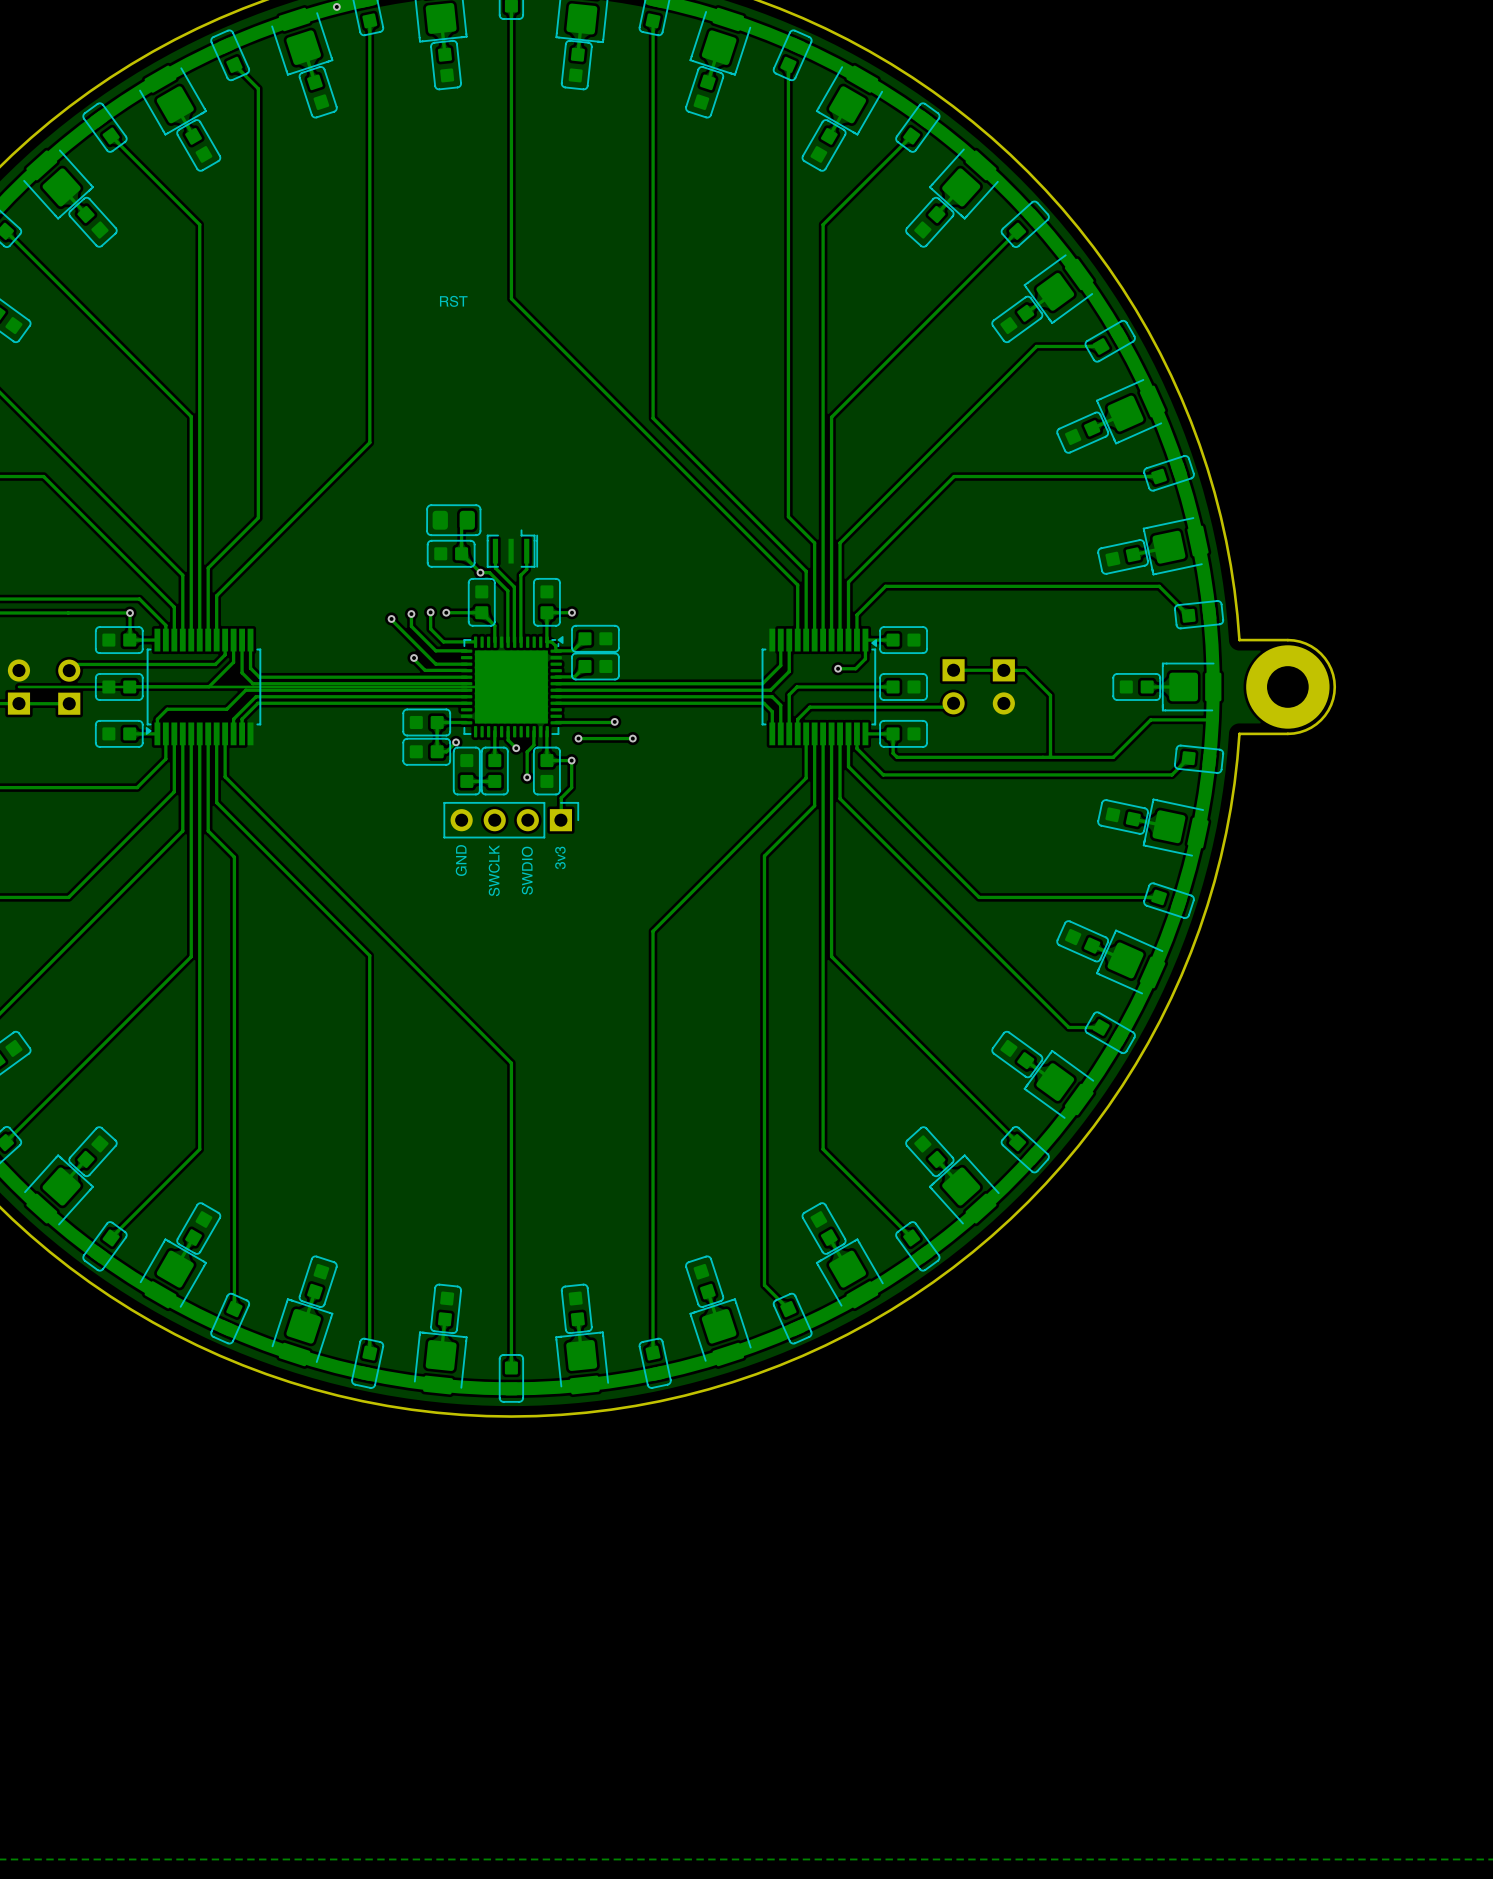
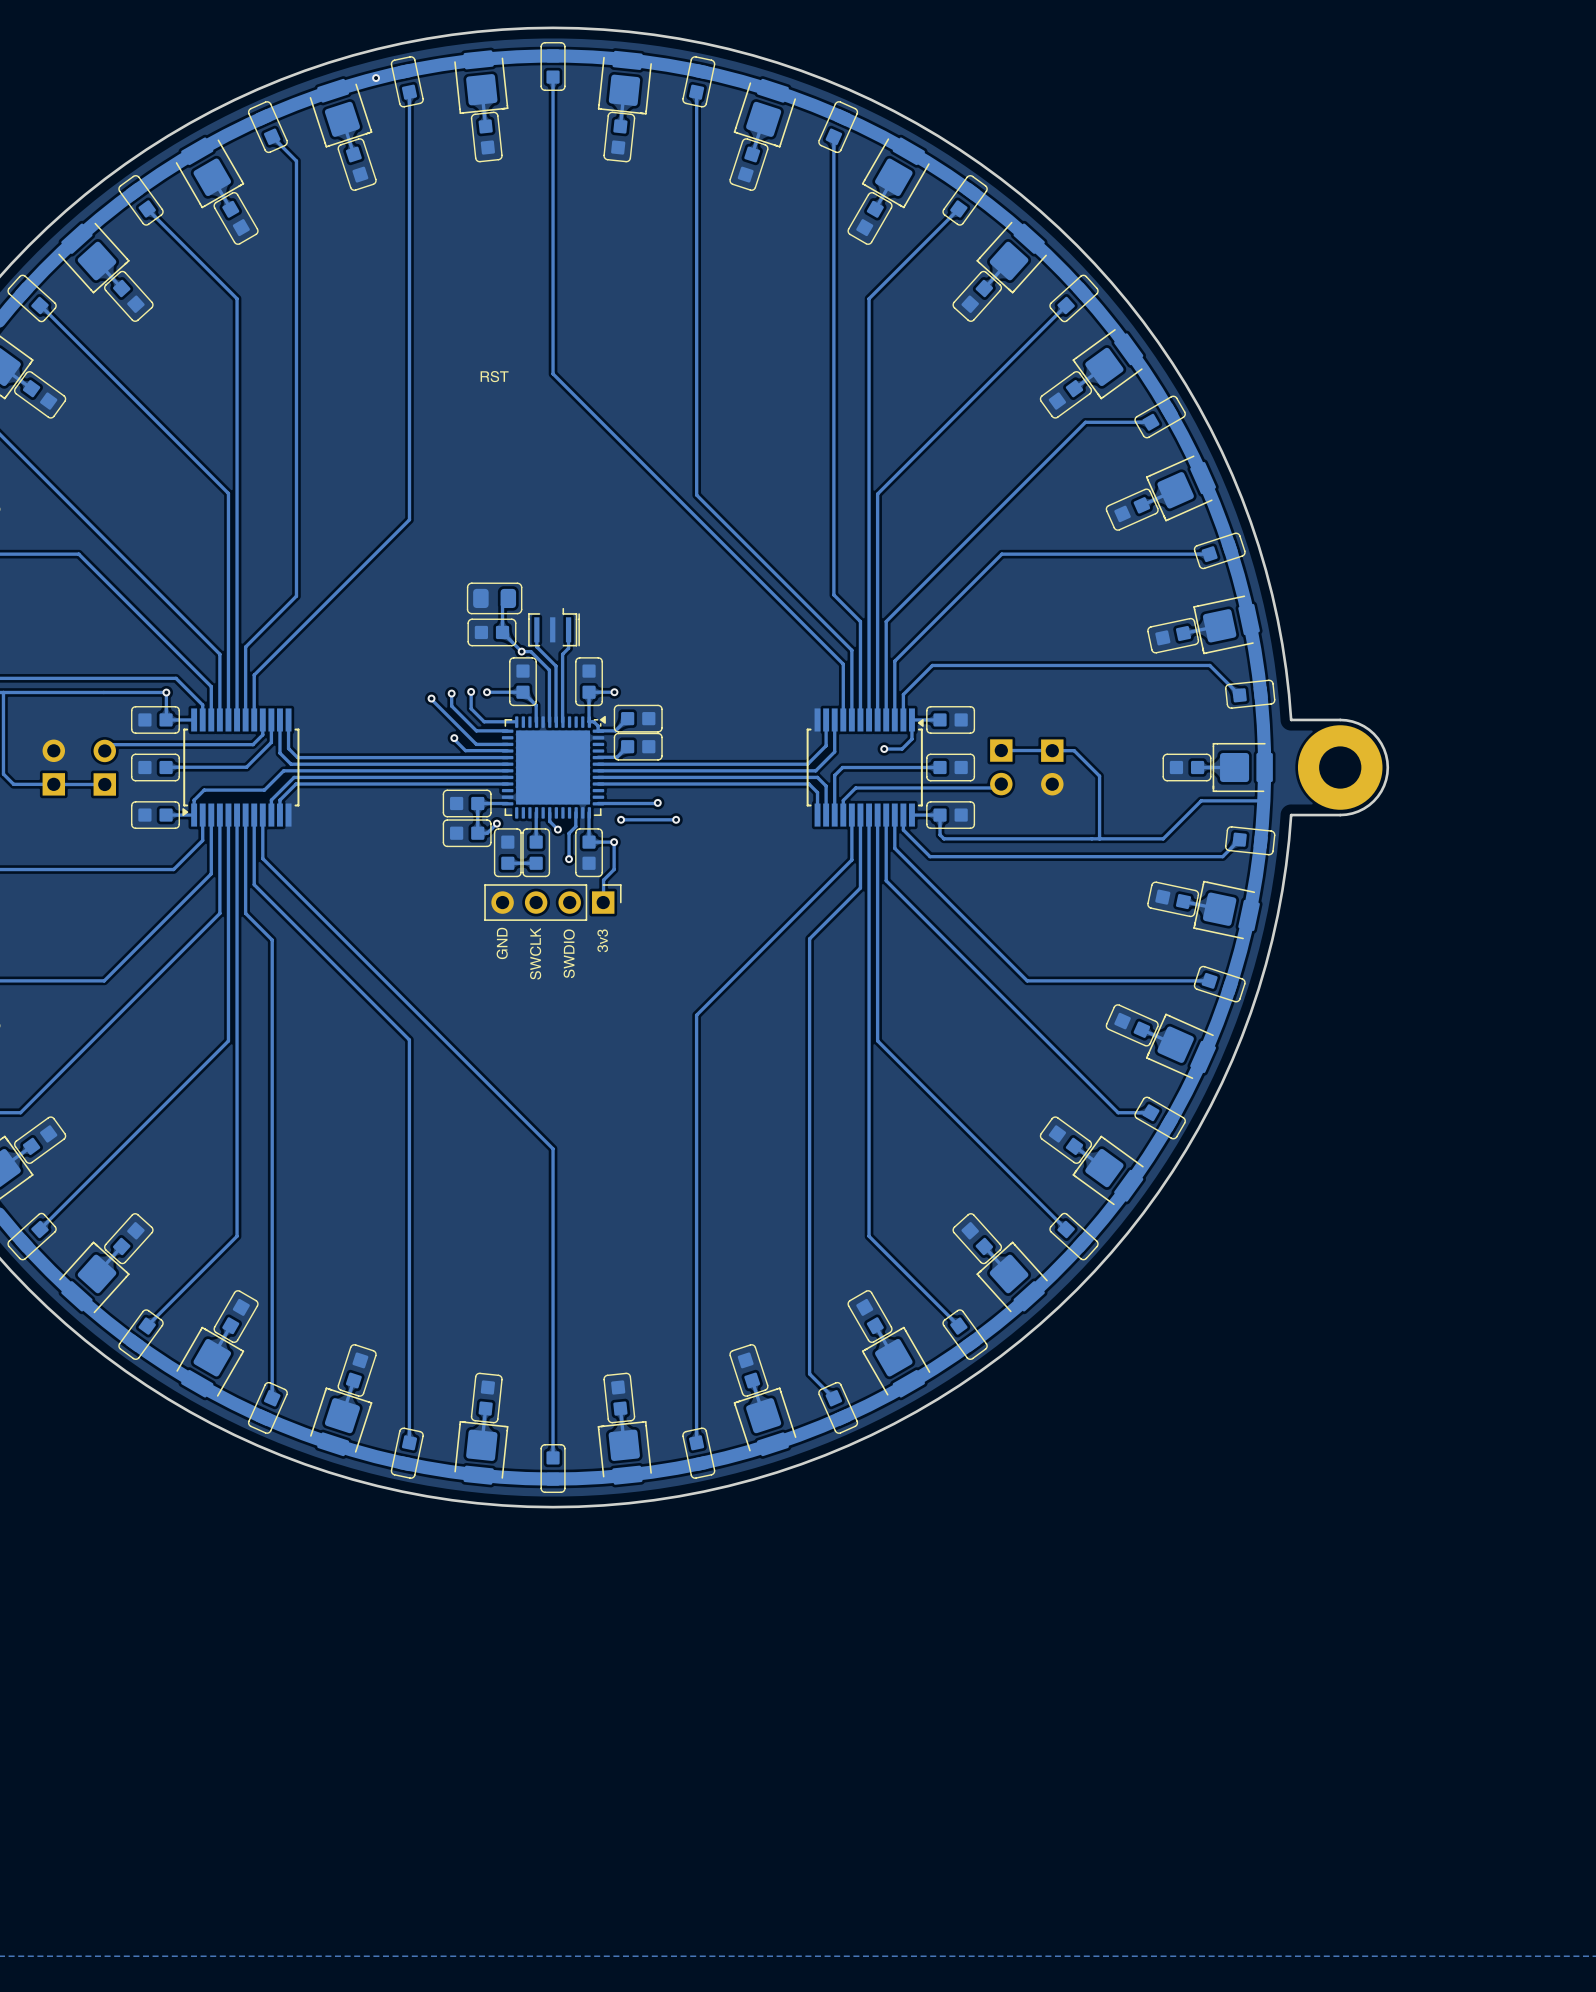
track: (511, 686) (18, 686) -> none

